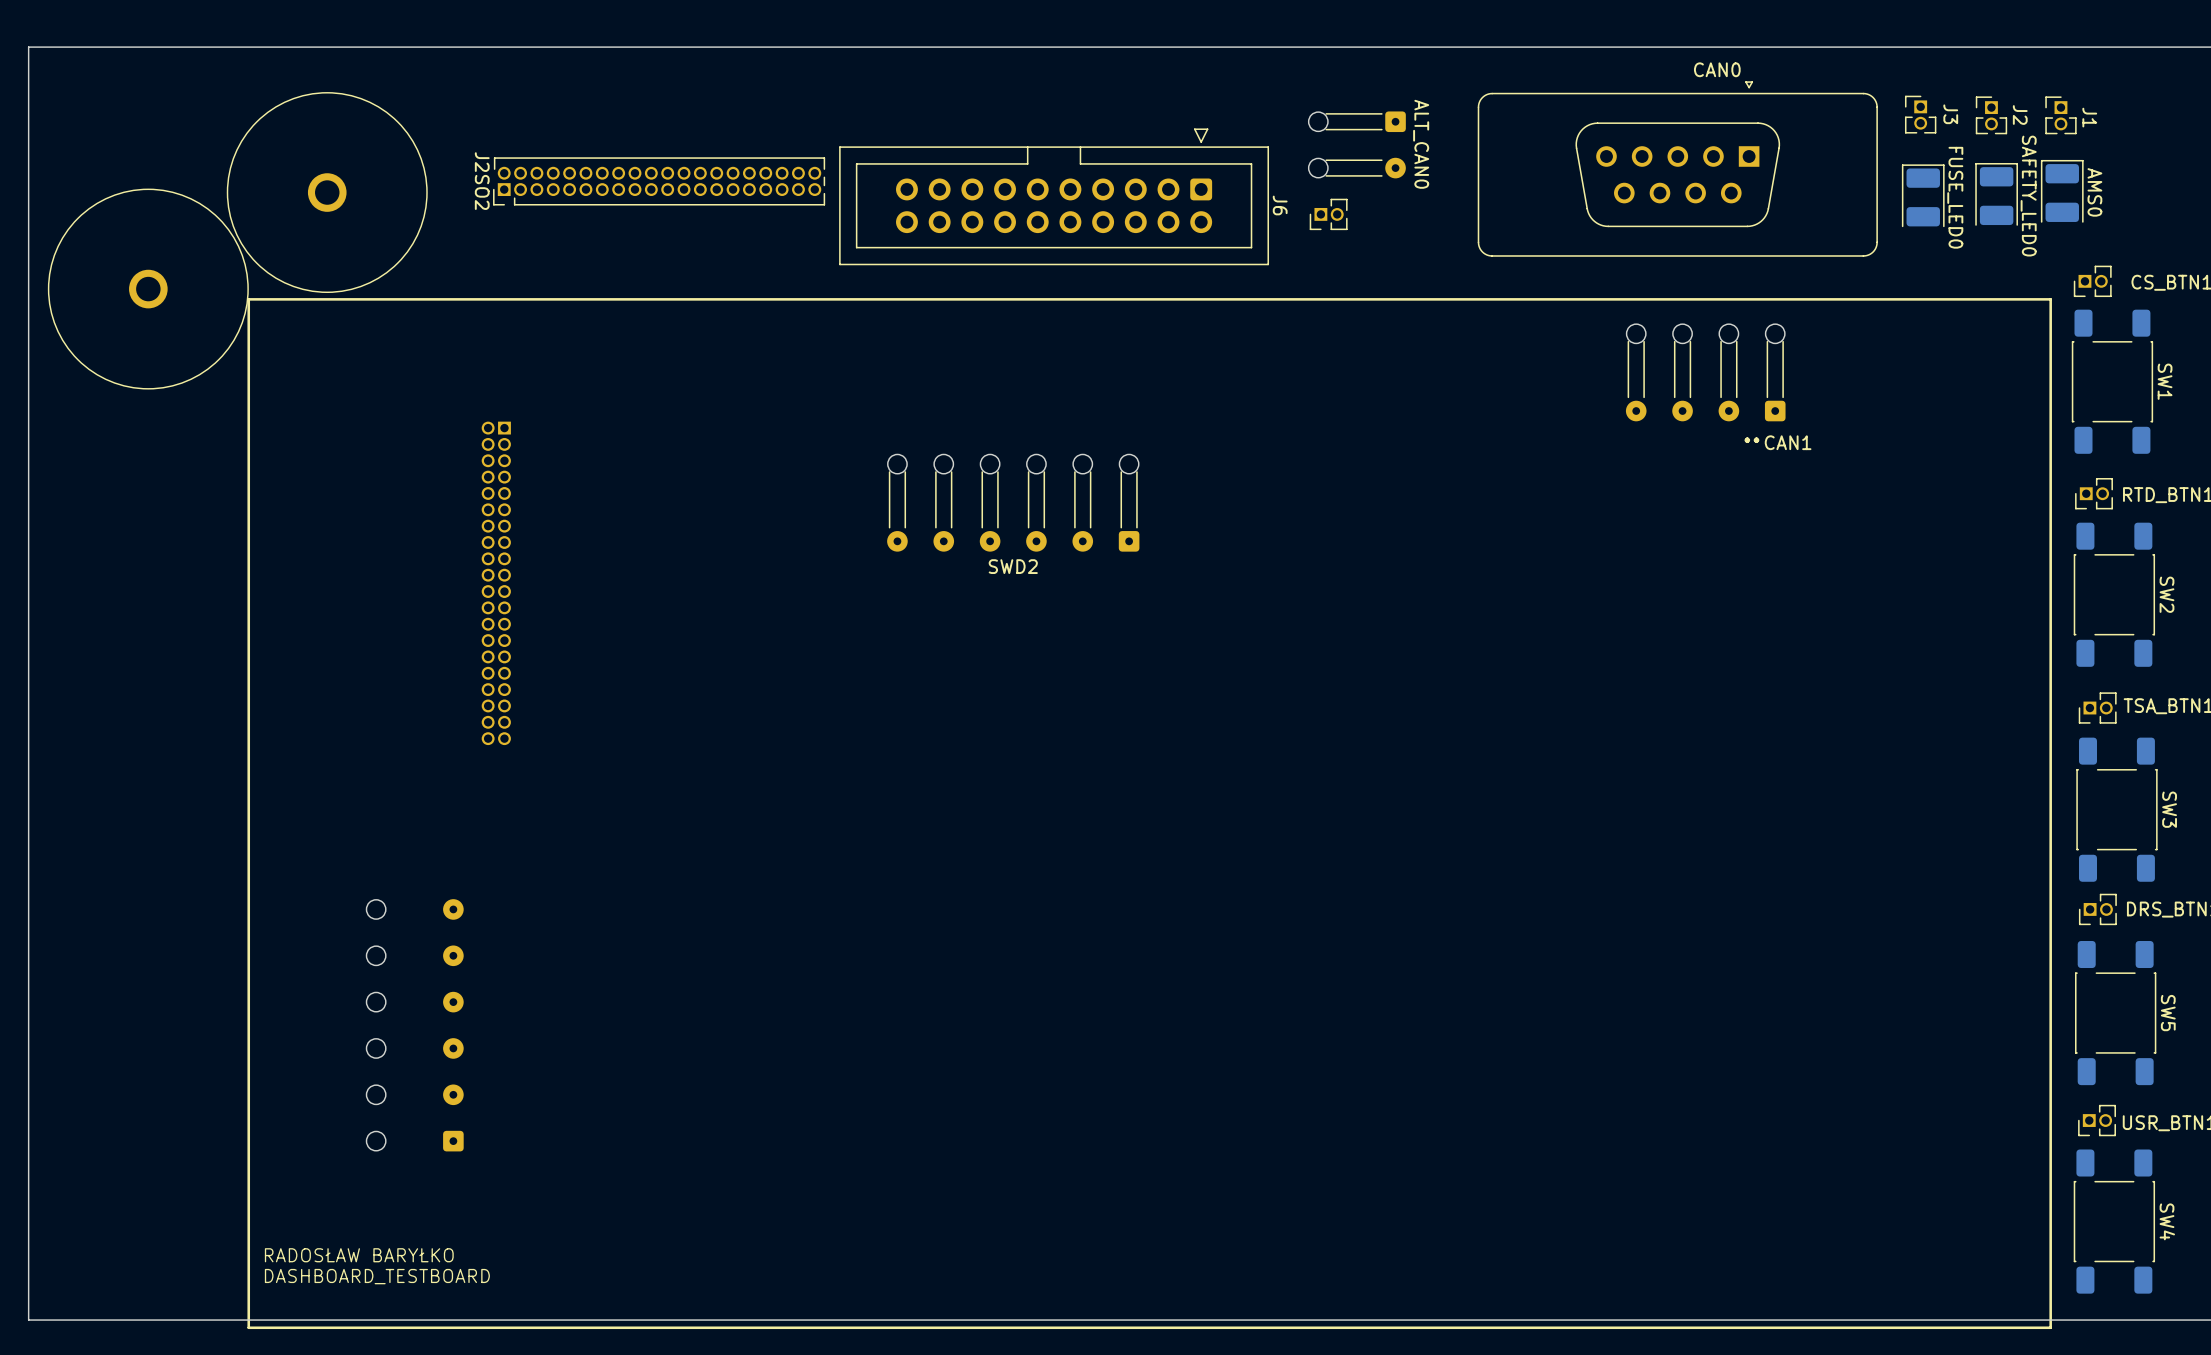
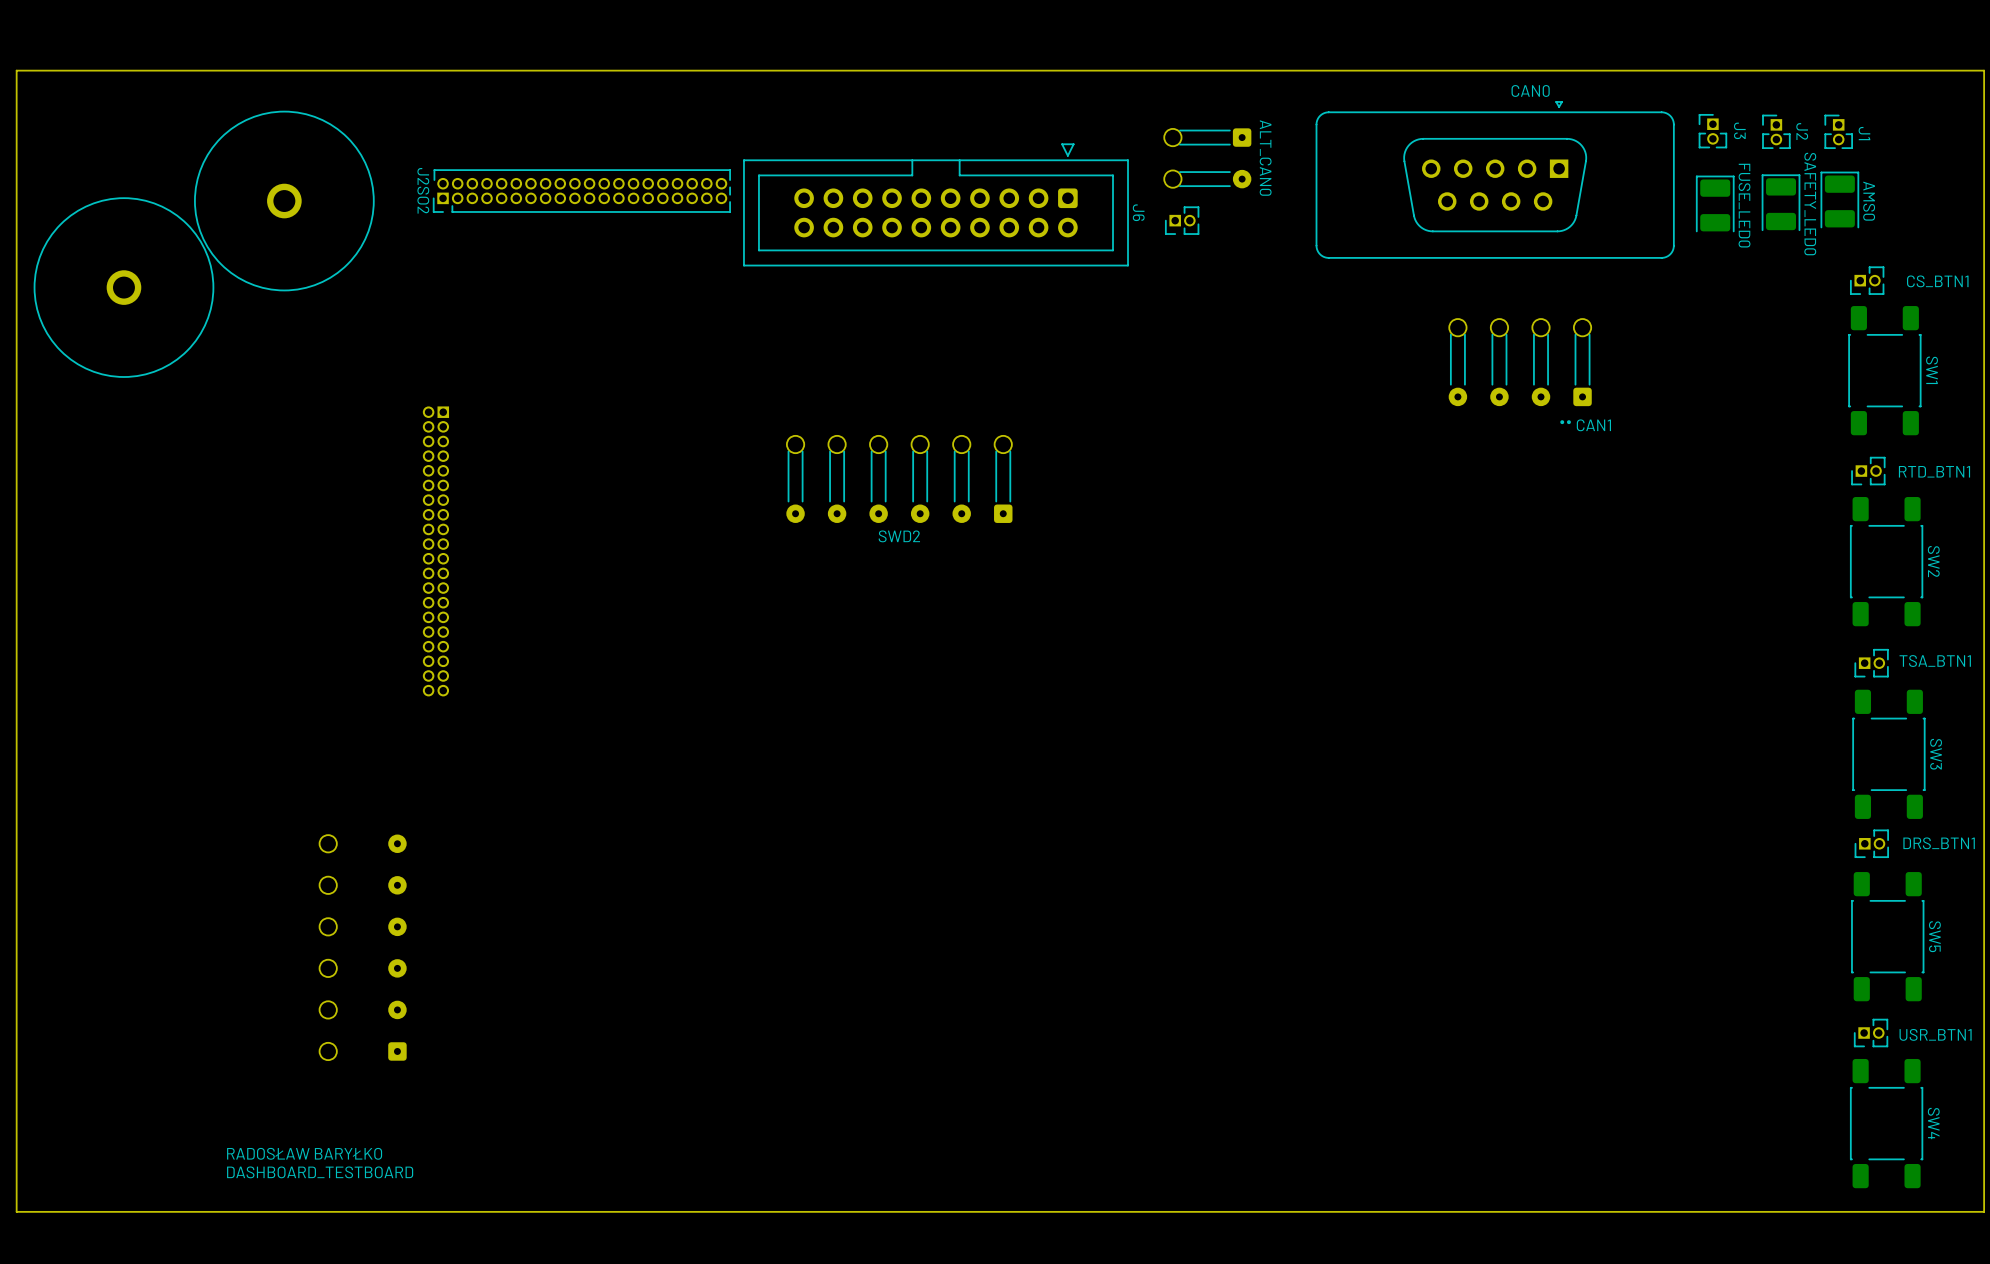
line: (2050, 299) (248, 299) (248, 1327) (2050, 1327) (2050, 299) -> none

